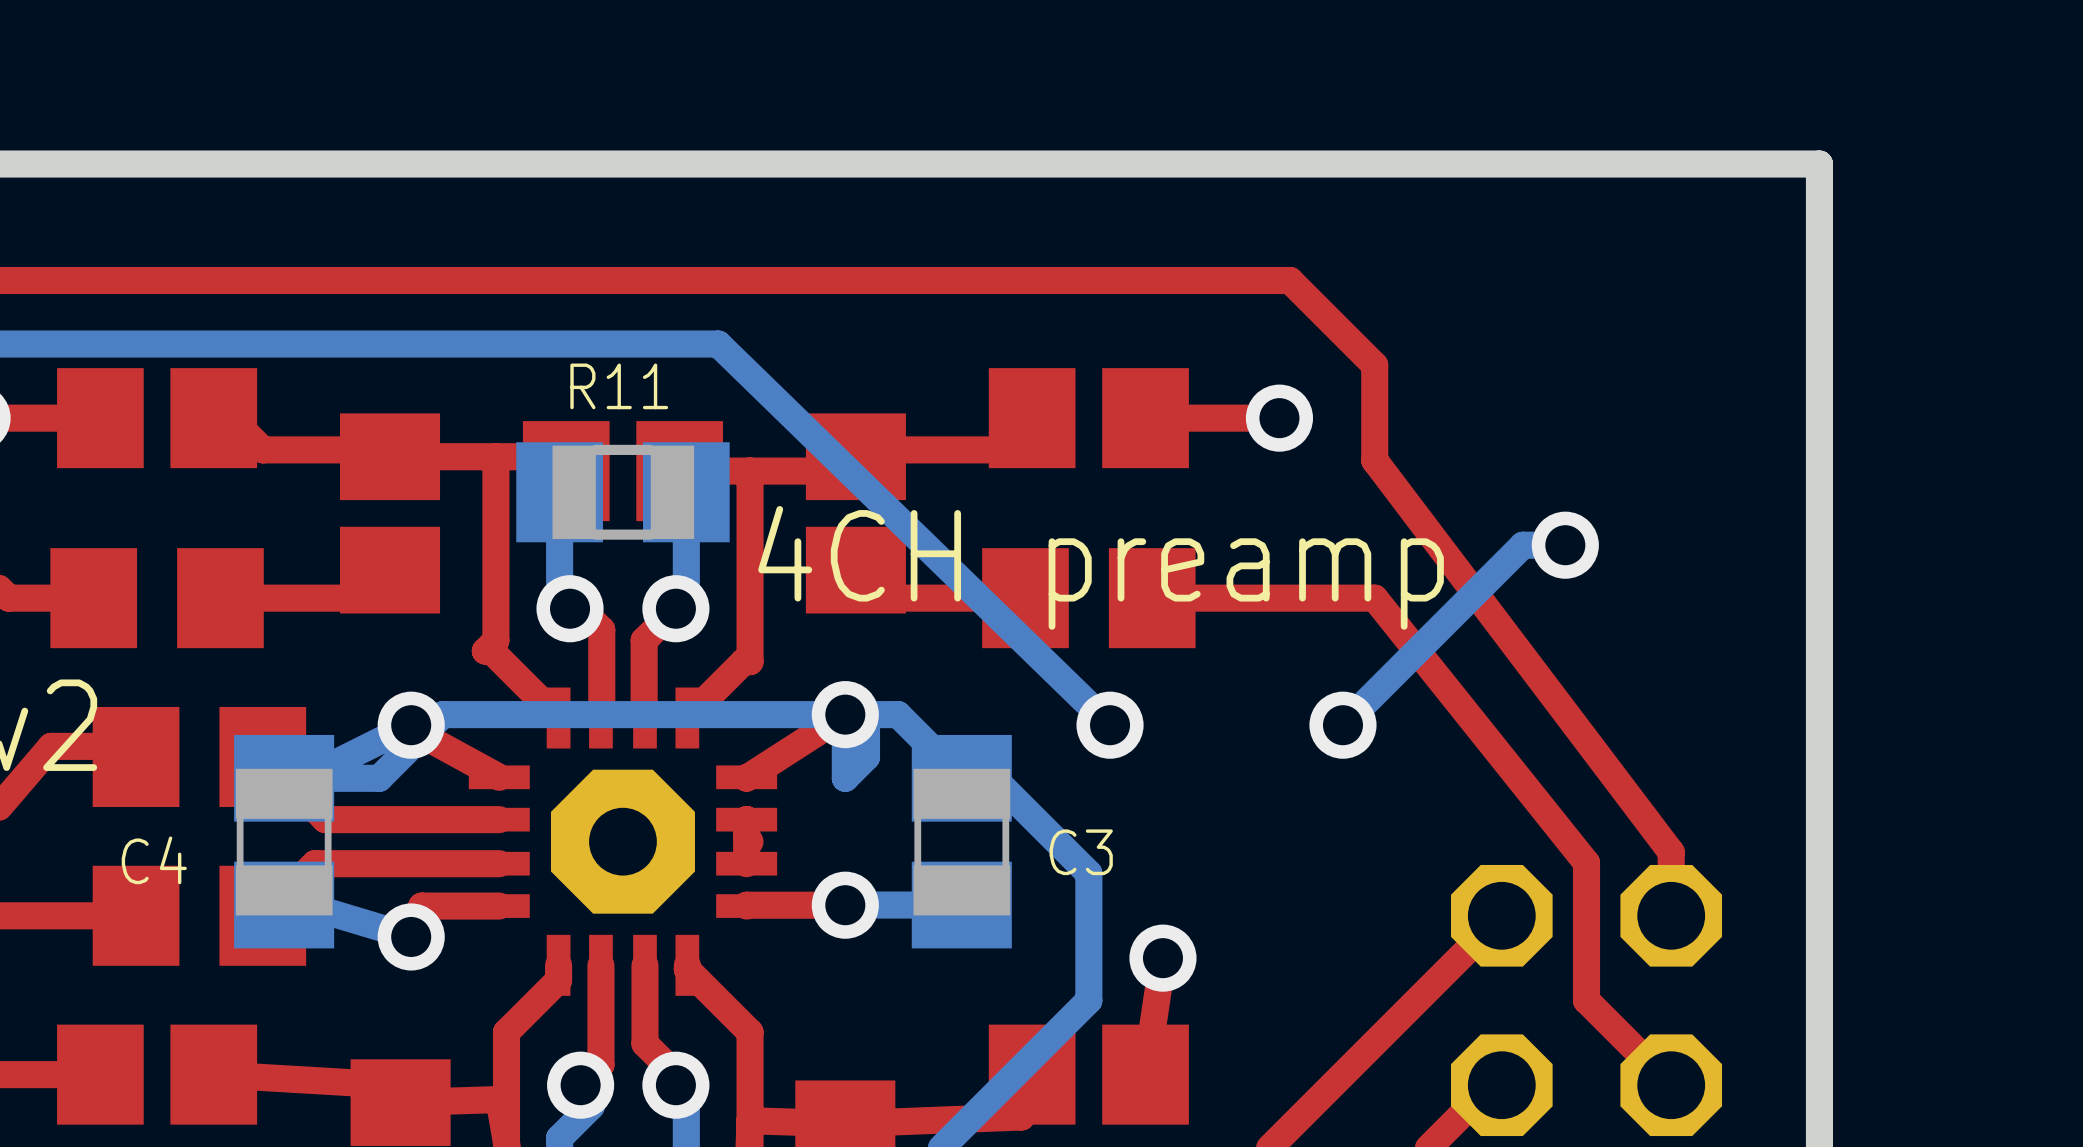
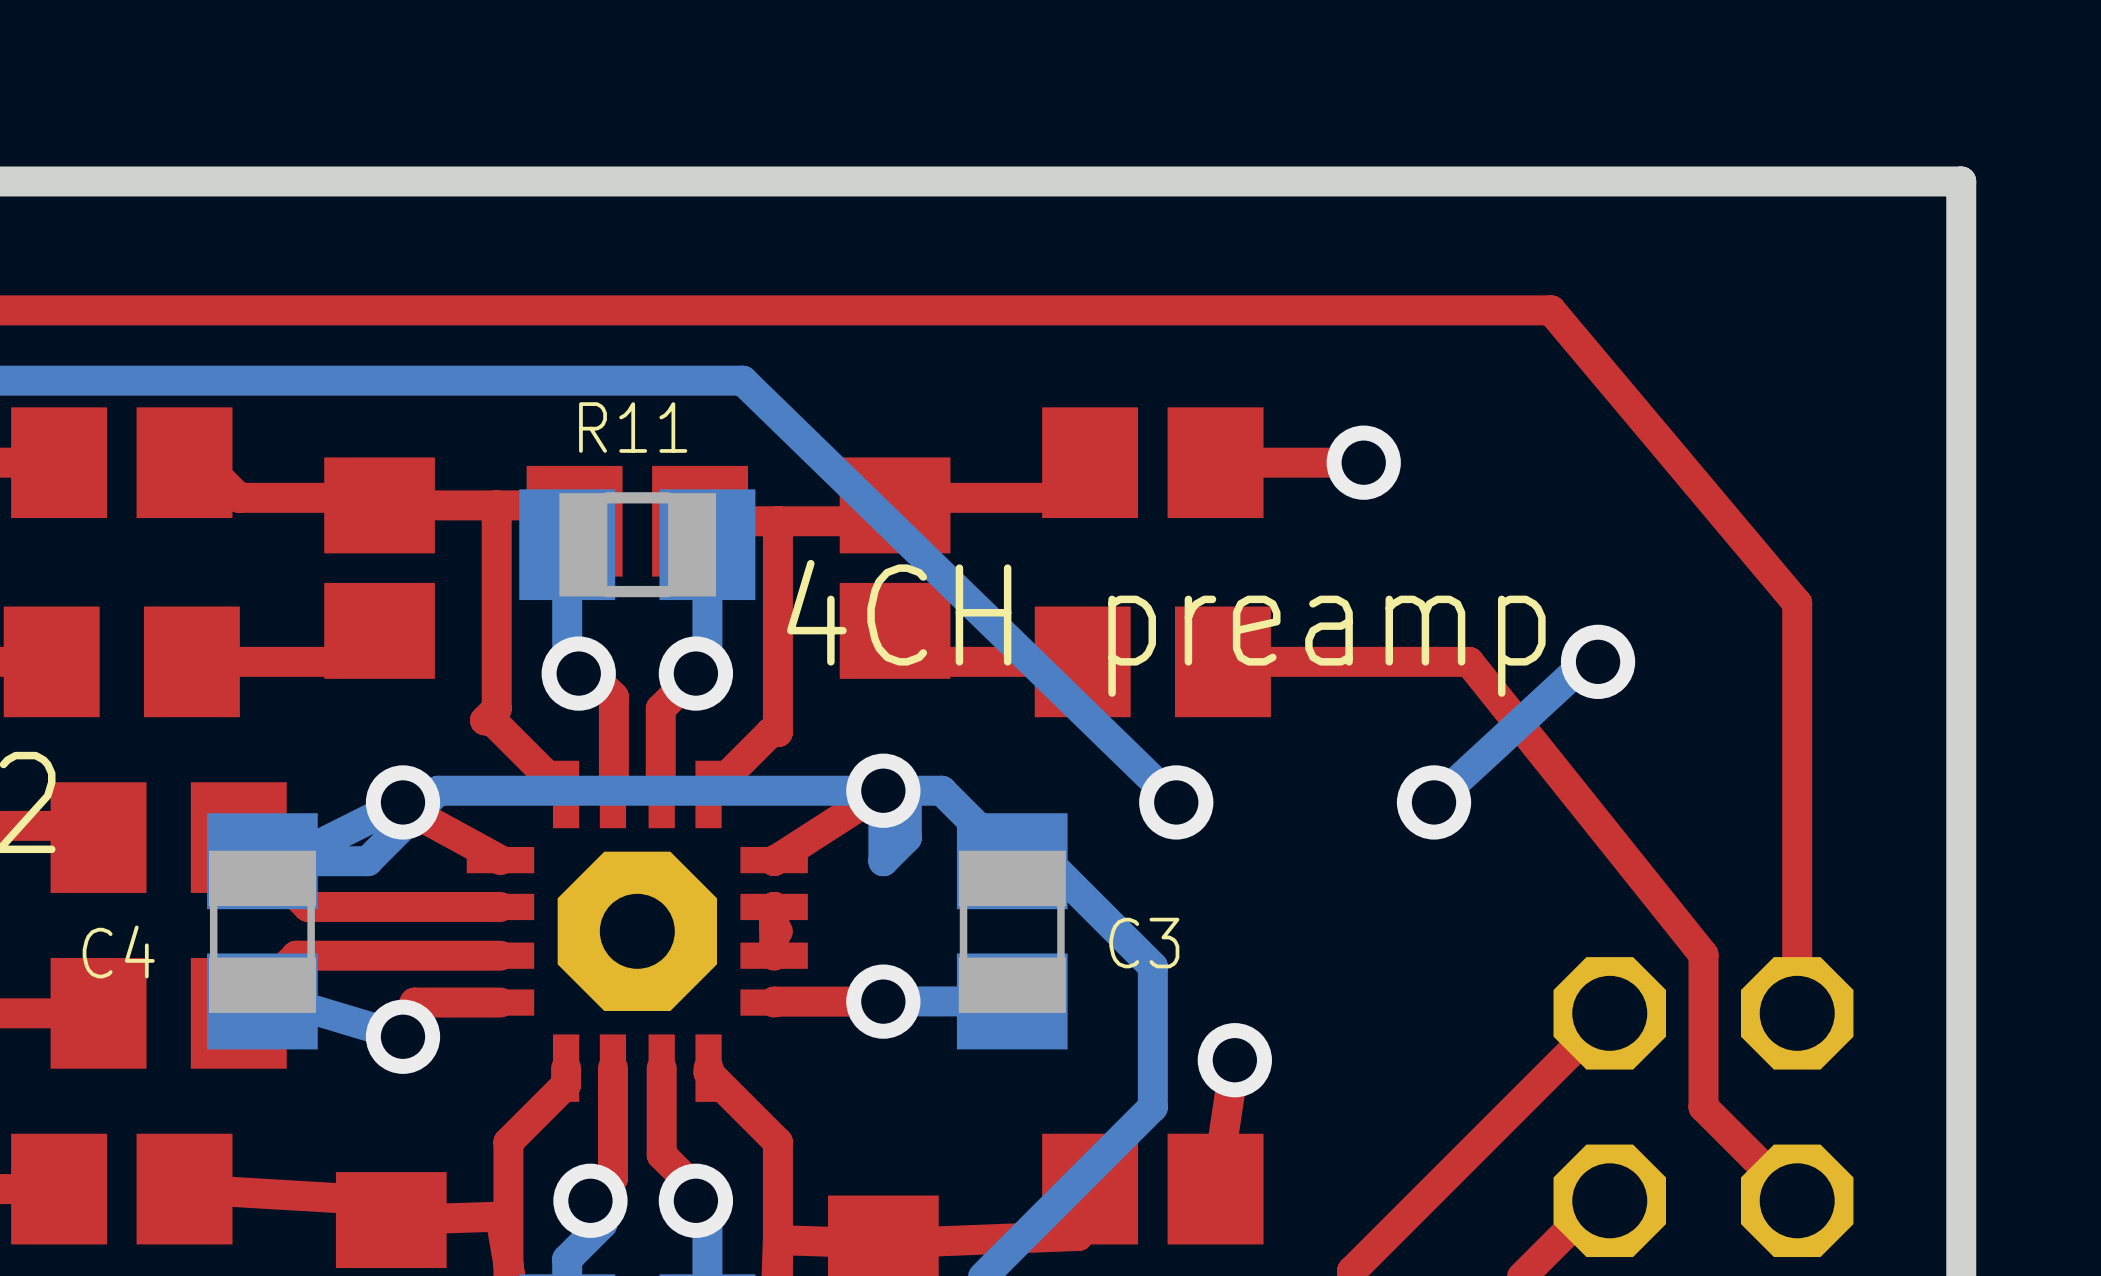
top track: (1290, 280) (1374, 365) (1374, 460) (1671, 852) -> (1375, 310) (1551, 310) (1797, 603) (1797, 943)
bottom track: (1565, 545) (1522, 545) (1342, 725) -> (1598, 661) (1586, 661) (1434, 802)
via position: (1565, 545) -> (1598, 661)

